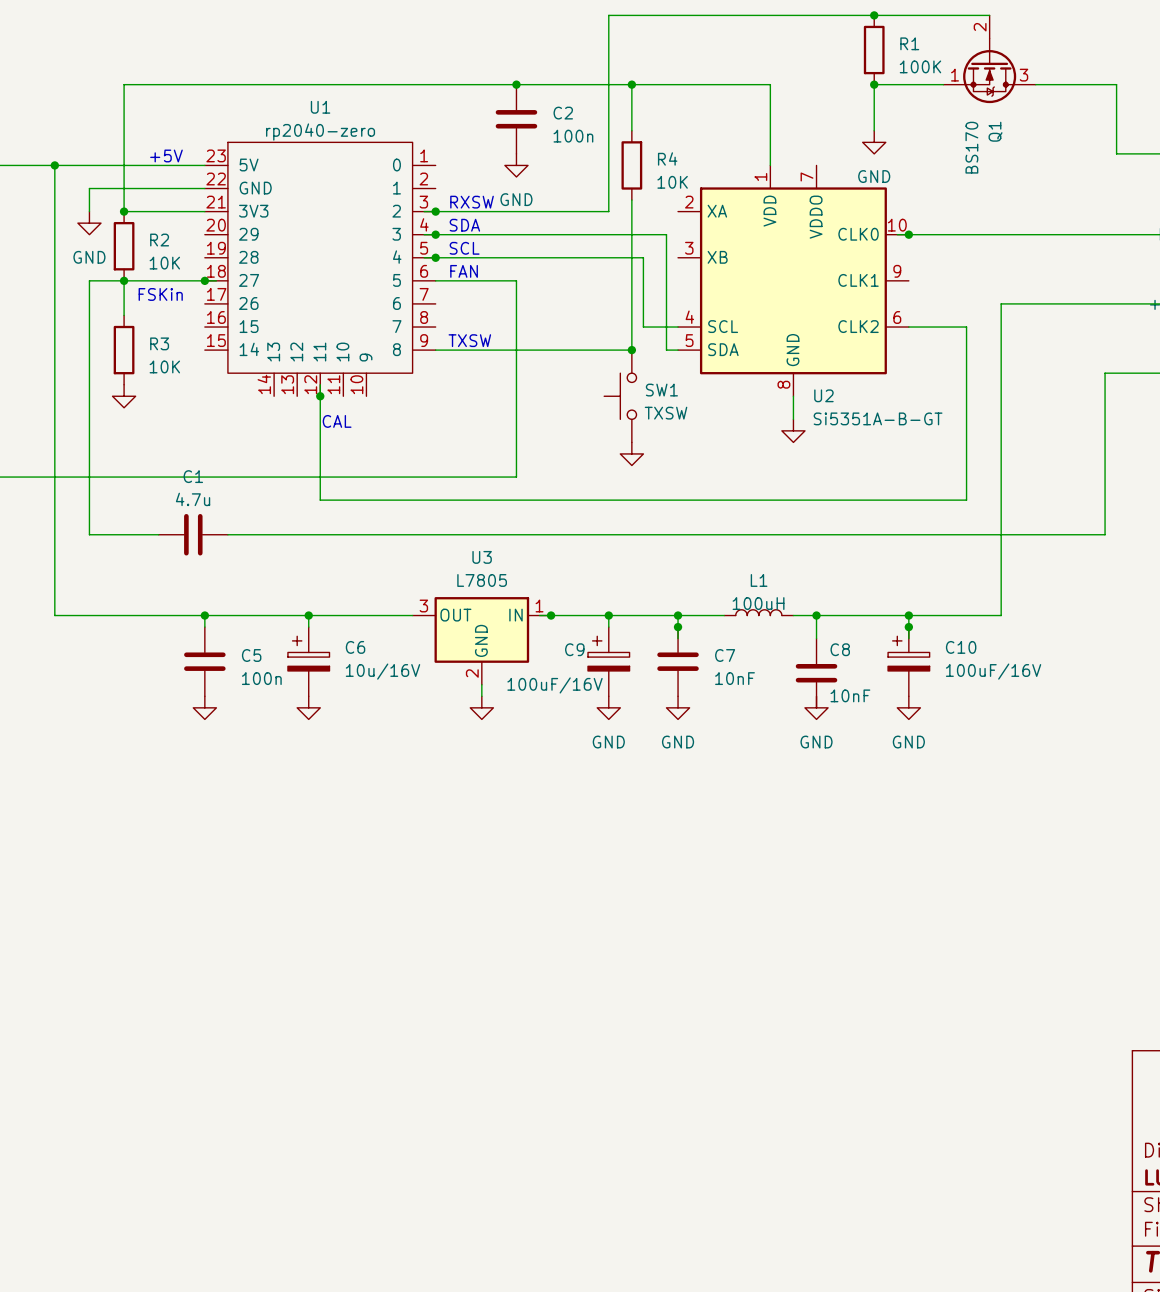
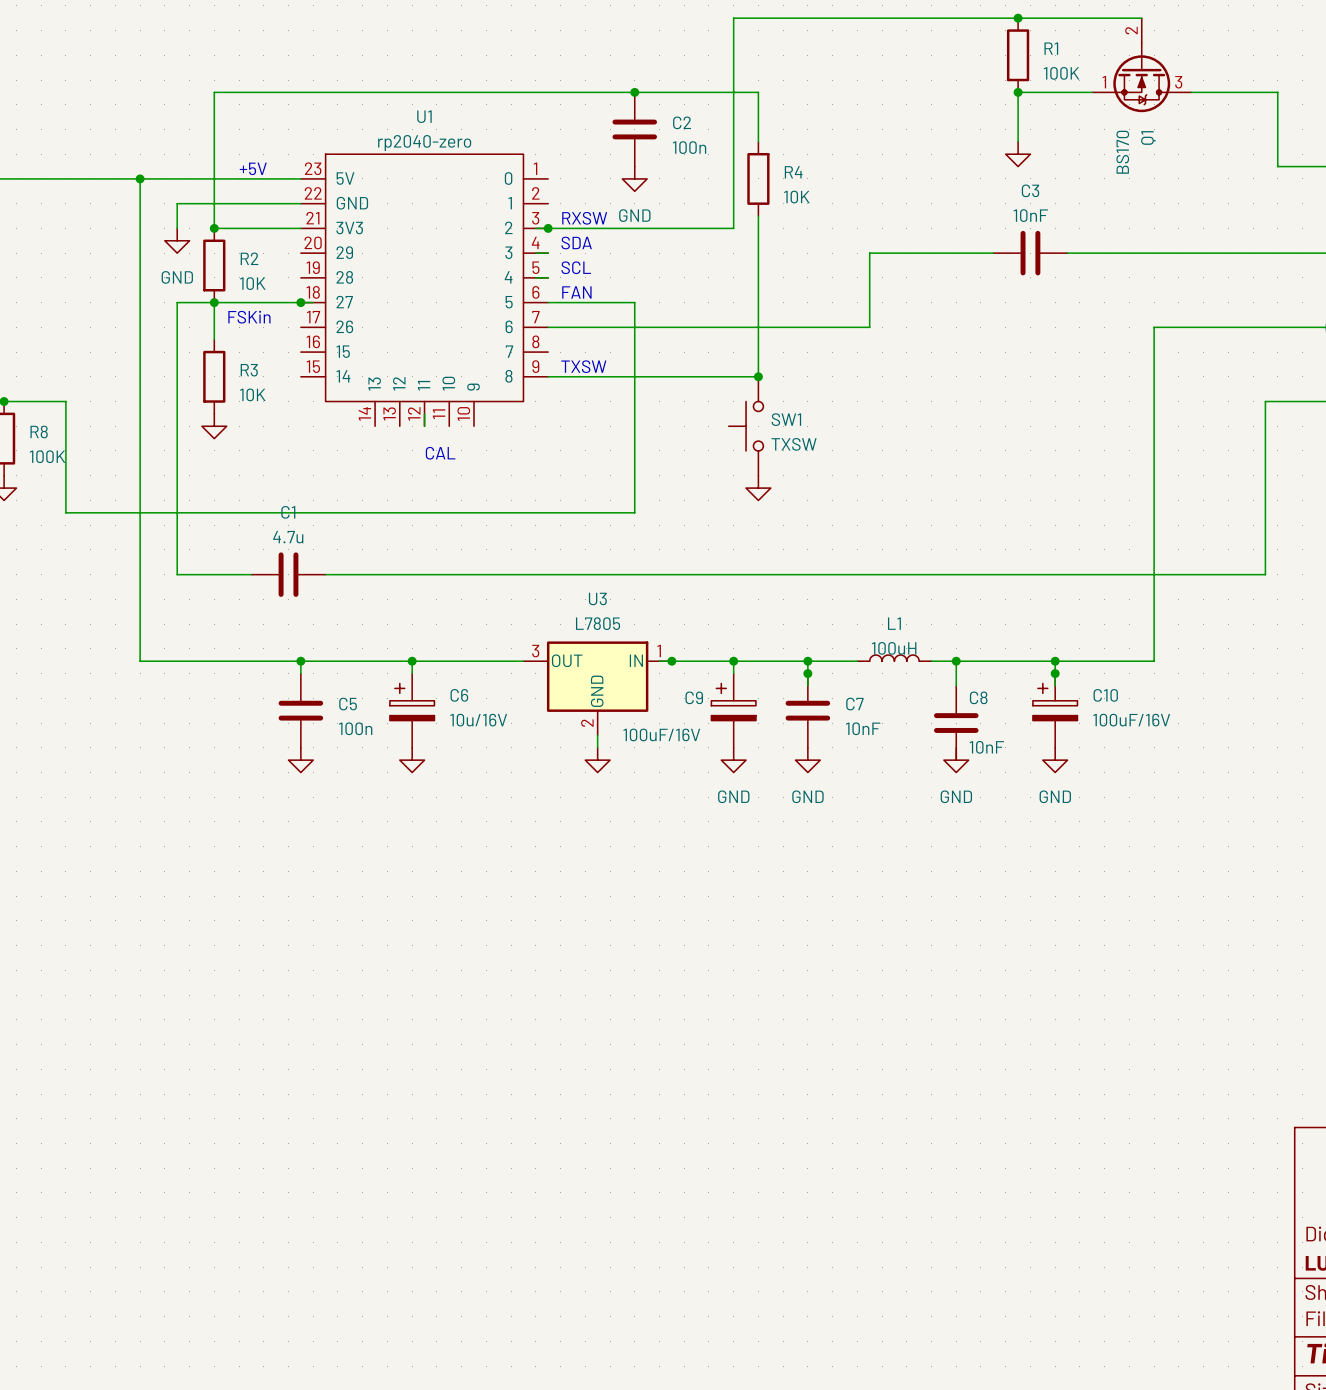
wire: (631, 84) (770, 84) (770, 165) -> none
junction: (631, 84) -> none
power symbol text: GND (874, 176) -> none
wire: (435, 234) (666, 234) (666, 350) (678, 350) -> none
junction: (435, 234) -> none
wire: none -> (993, 253) (869, 253) (869, 327) (548, 327)
C3: none -> 10nF (1030, 253)
junction: (908, 234) -> none
wire: (435, 257) (643, 257) (643, 327) (678, 327) -> none
junction: (435, 257) -> none
U2: Si5351A-B-GT (793, 280) -> none
wire: (908, 327) (966, 327) (966, 500) (320, 500) (320, 396) -> none
junction: (320, 396) -> none
wire: (793, 396) (793, 419) -> none
power symbol: (793, 430) -> none

